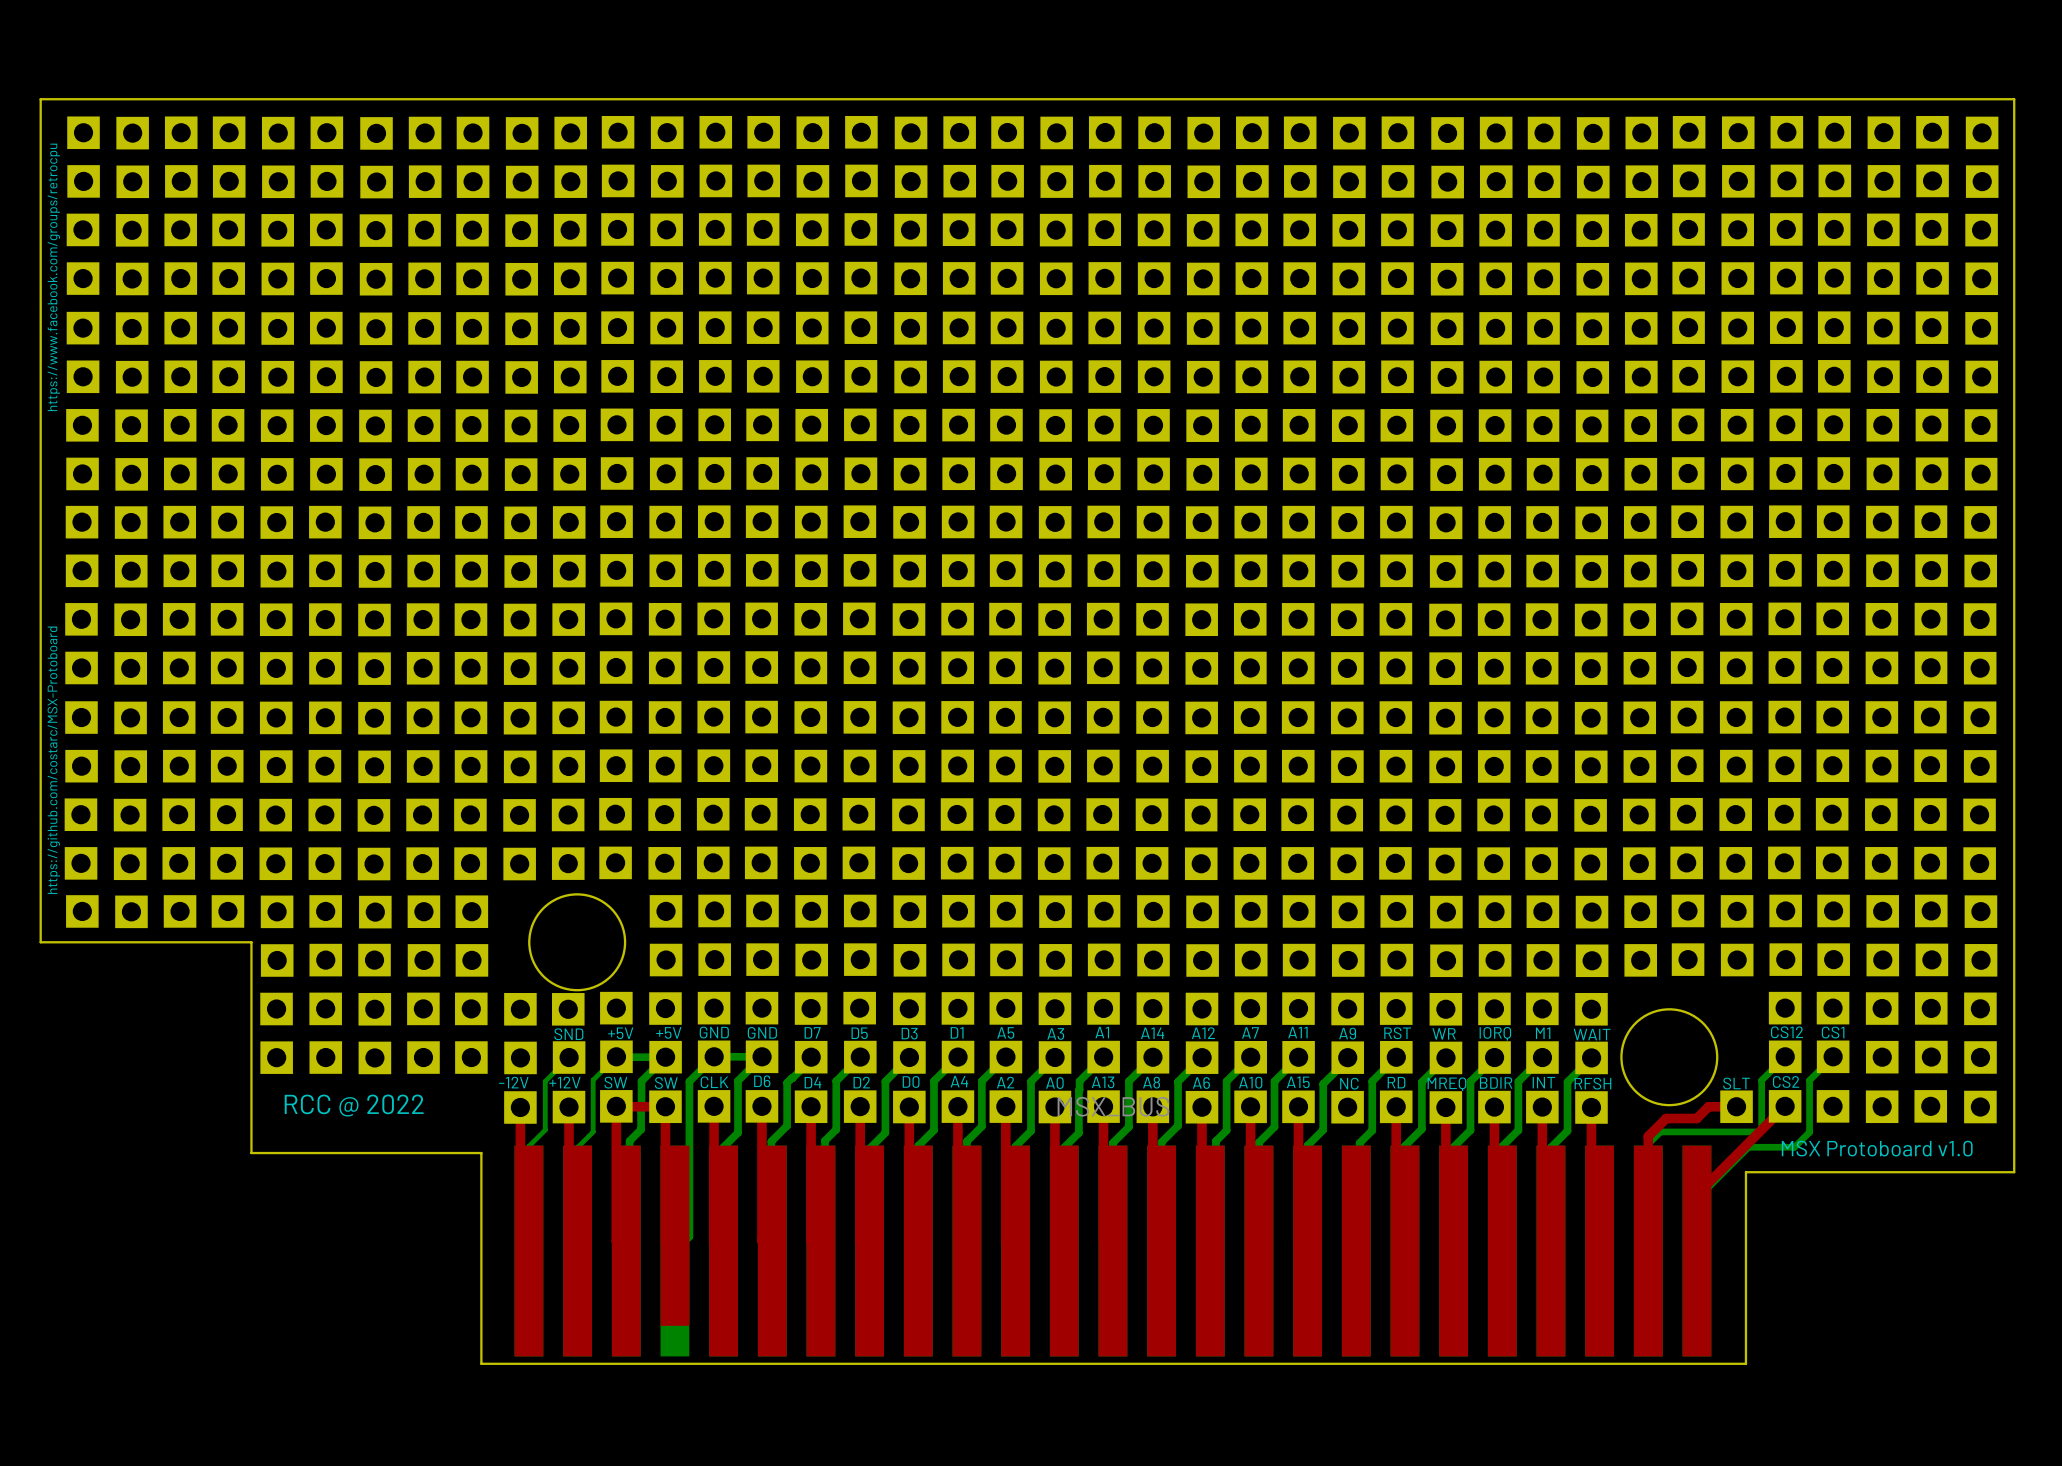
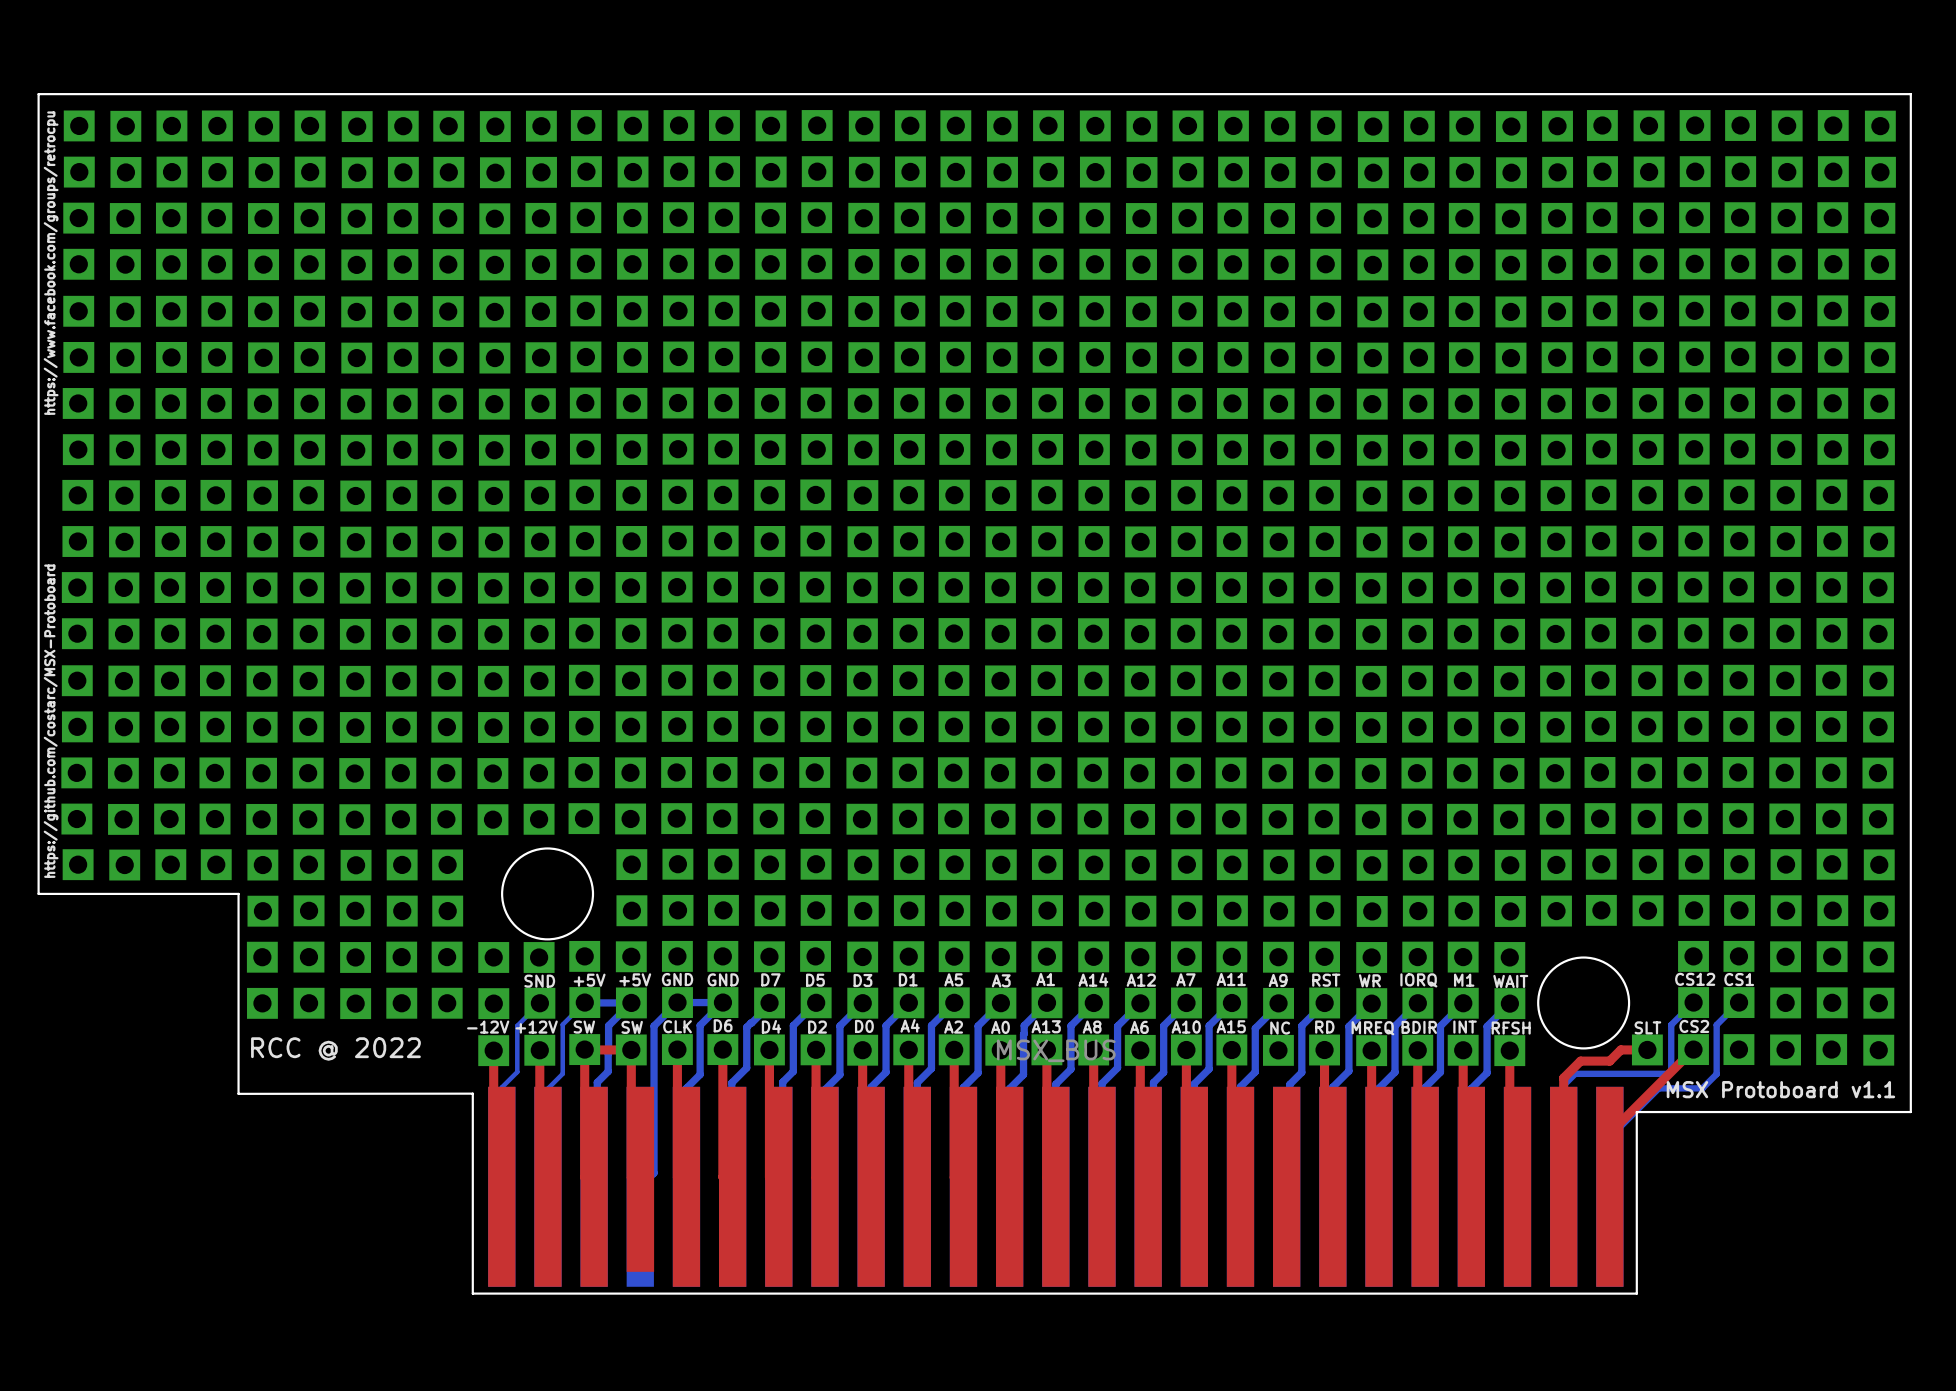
part footprint: [39, 98, 2016, 1365] -> [37, 93, 1912, 1295]
text: MSX Protoboard v1.0 (1877, 1148) -> MSX Protoboard v1.1 (1780, 1089)

